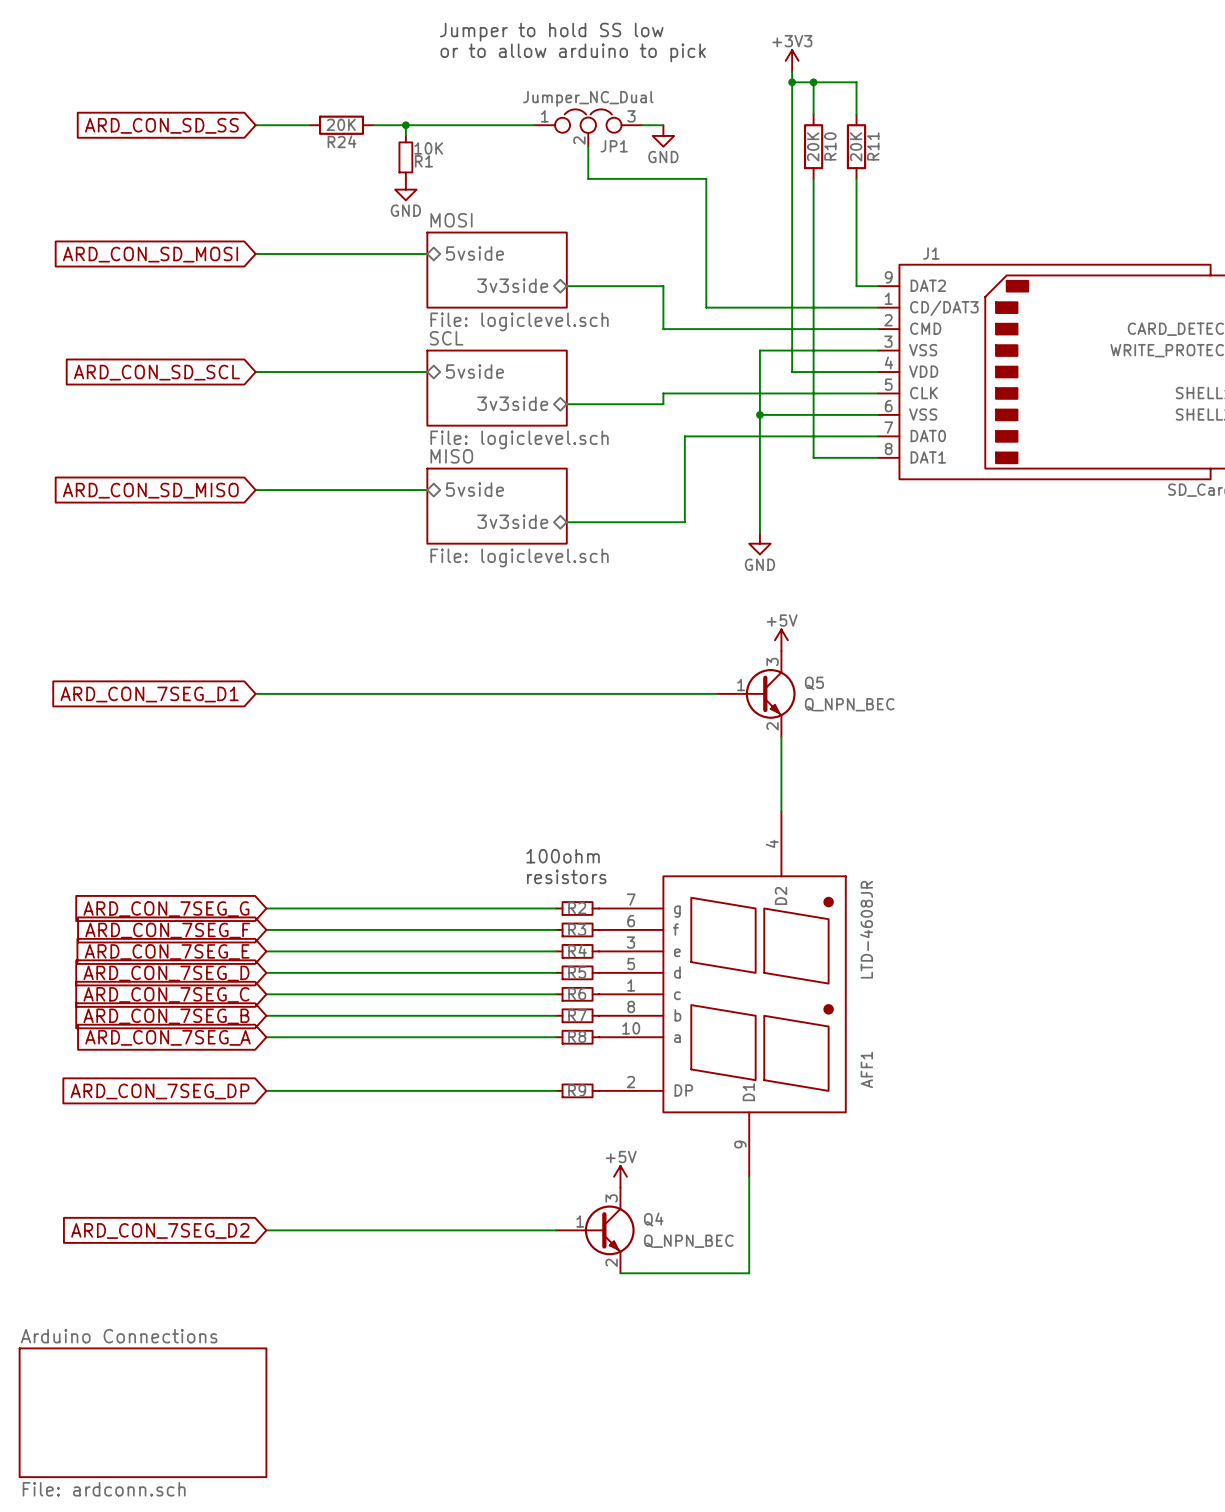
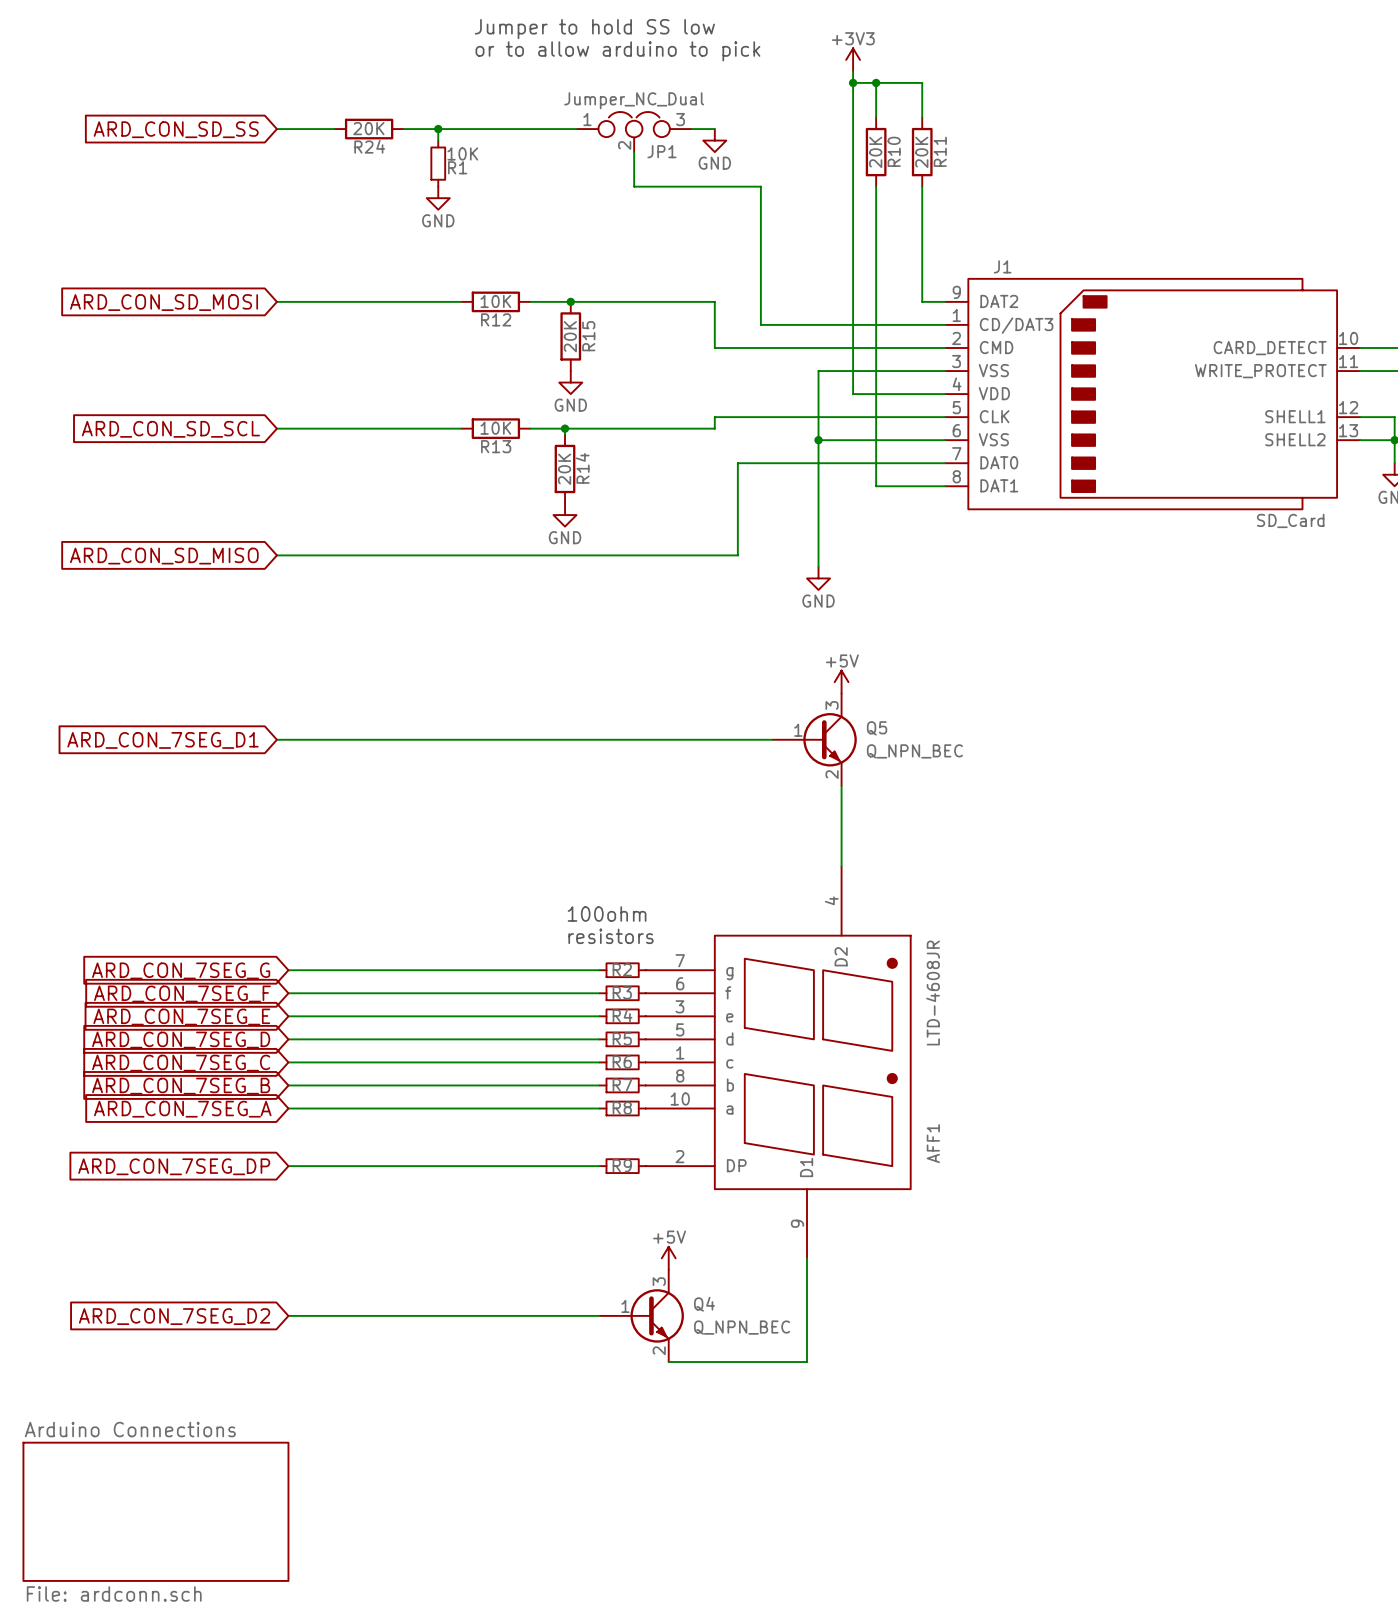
wire: (255, 253) (427, 253) -> (276, 301) (461, 301)
sheet pin: 5vside (474, 253) -> none
global label position: ARD_CON_SD_MOSI (150, 254) -> ARD_CON_SD_MOSI (164, 302)
sheet MOSI: File: logiclevel.sch (497, 270) -> none
sheet pin: 3v3side (512, 285) -> none
R12: none -> 10K (495, 301)
wire: none -> (530, 301) (611, 301)
junction: none -> (570, 301)
R15: none -> 20K (570, 336)
power symbol: none -> GND (570, 382)
sheet pin: 5vside (474, 371) -> none
global label position: ARD_CON_SD_SCL (156, 372) -> ARD_CON_SD_SCL (170, 429)
wire: (255, 372) (427, 372) -> (276, 428) (461, 428)
sheet SCL: File: logiclevel.sch (497, 388) -> none
sheet pin: 3v3side (512, 403) -> none
R13: none -> 10K (495, 428)
wire: none -> (530, 428) (611, 428)
junction: none -> (565, 428)
R14: none -> 20K (565, 468)
power symbol: none -> GND (565, 515)
sheet pin: 5vside (474, 489) -> none
global label position: ARD_CON_SD_MISO (150, 490) -> ARD_CON_SD_MISO (164, 556)
wire: (255, 490) (427, 490) -> none
sheet MISO: File: logiclevel.sch (497, 506) -> none
sheet pin: 3v3side (512, 521) -> none
wire: none -> (276, 555) (611, 555)

